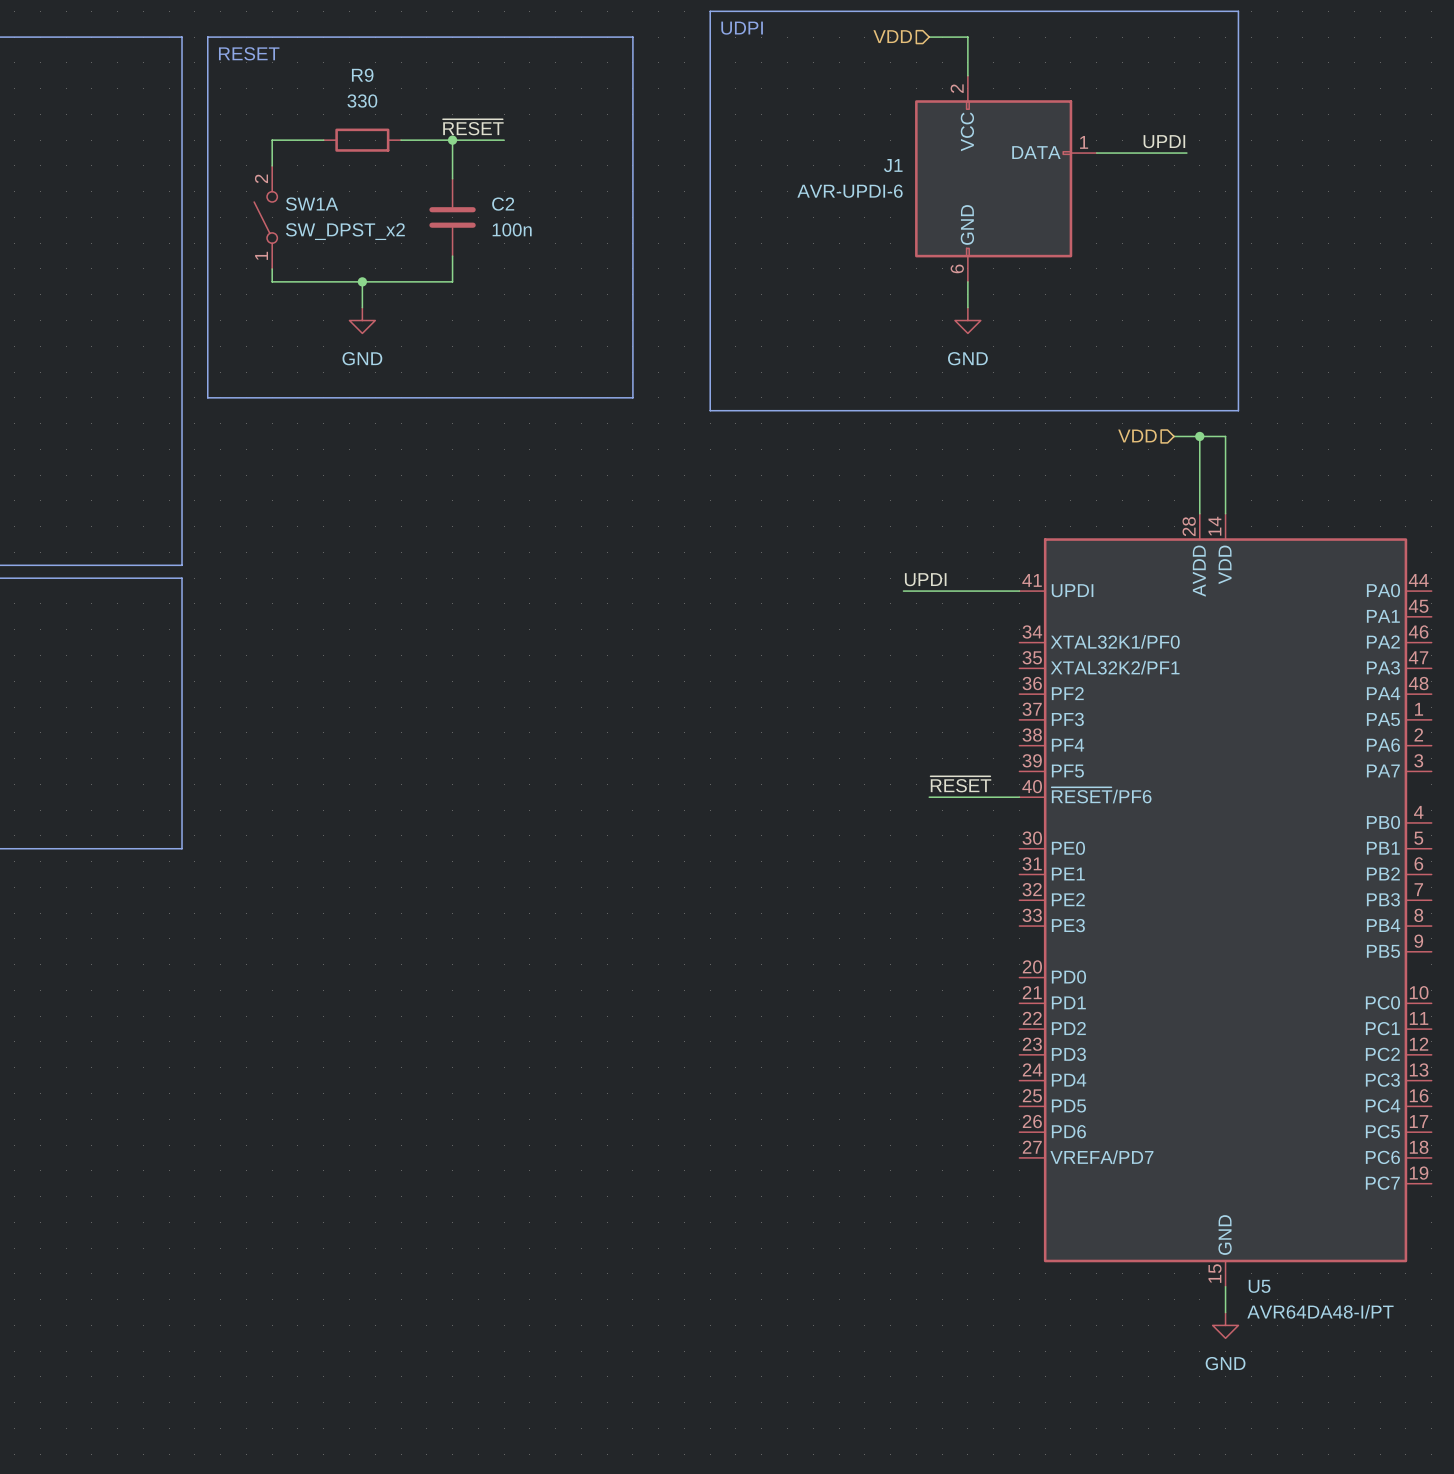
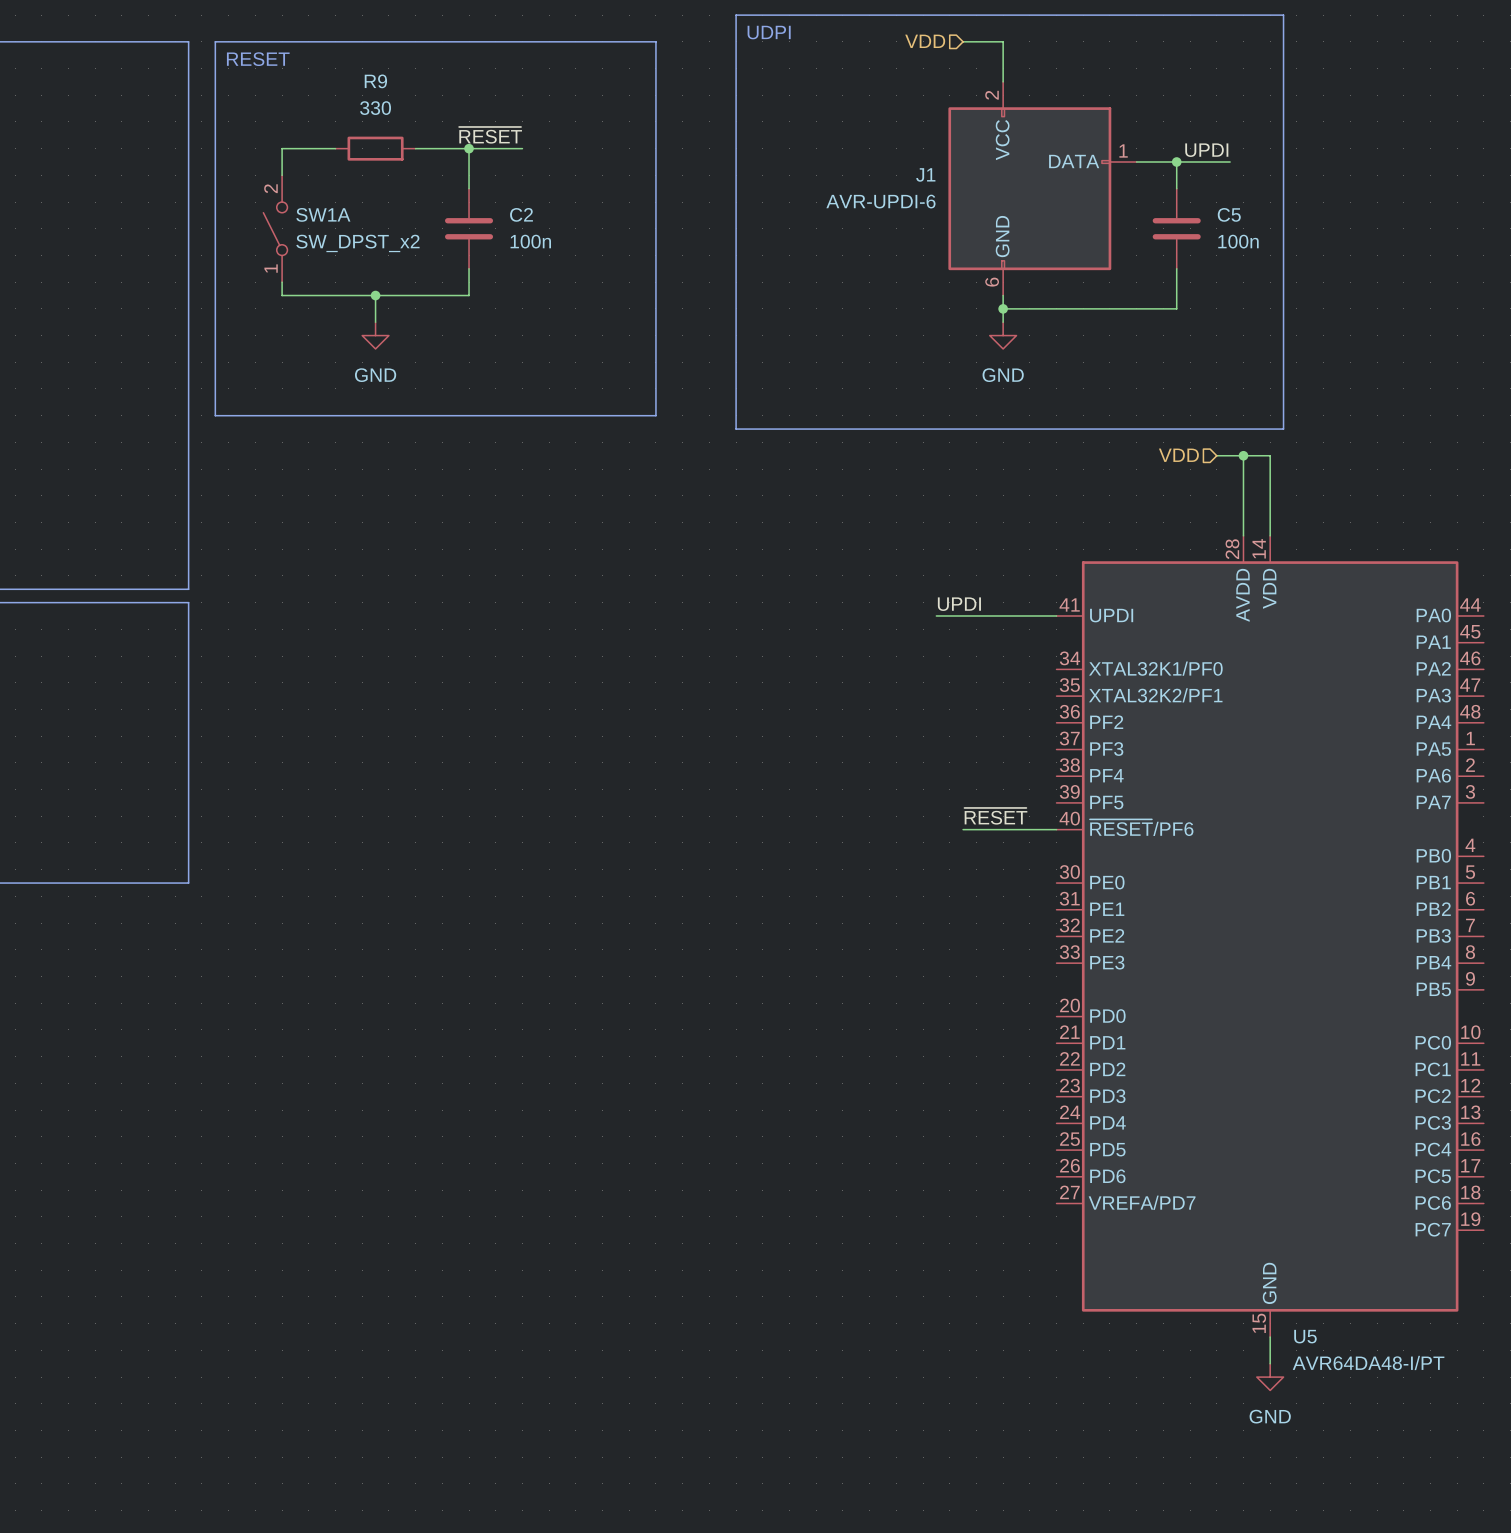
wire: none -> (1176, 162) (1176, 188)
junction: none -> (1176, 162)
C5: none -> 100n (1176, 228)
wire: none -> (1176, 268) (1176, 308) (1003, 308)
junction: none -> (1003, 308)

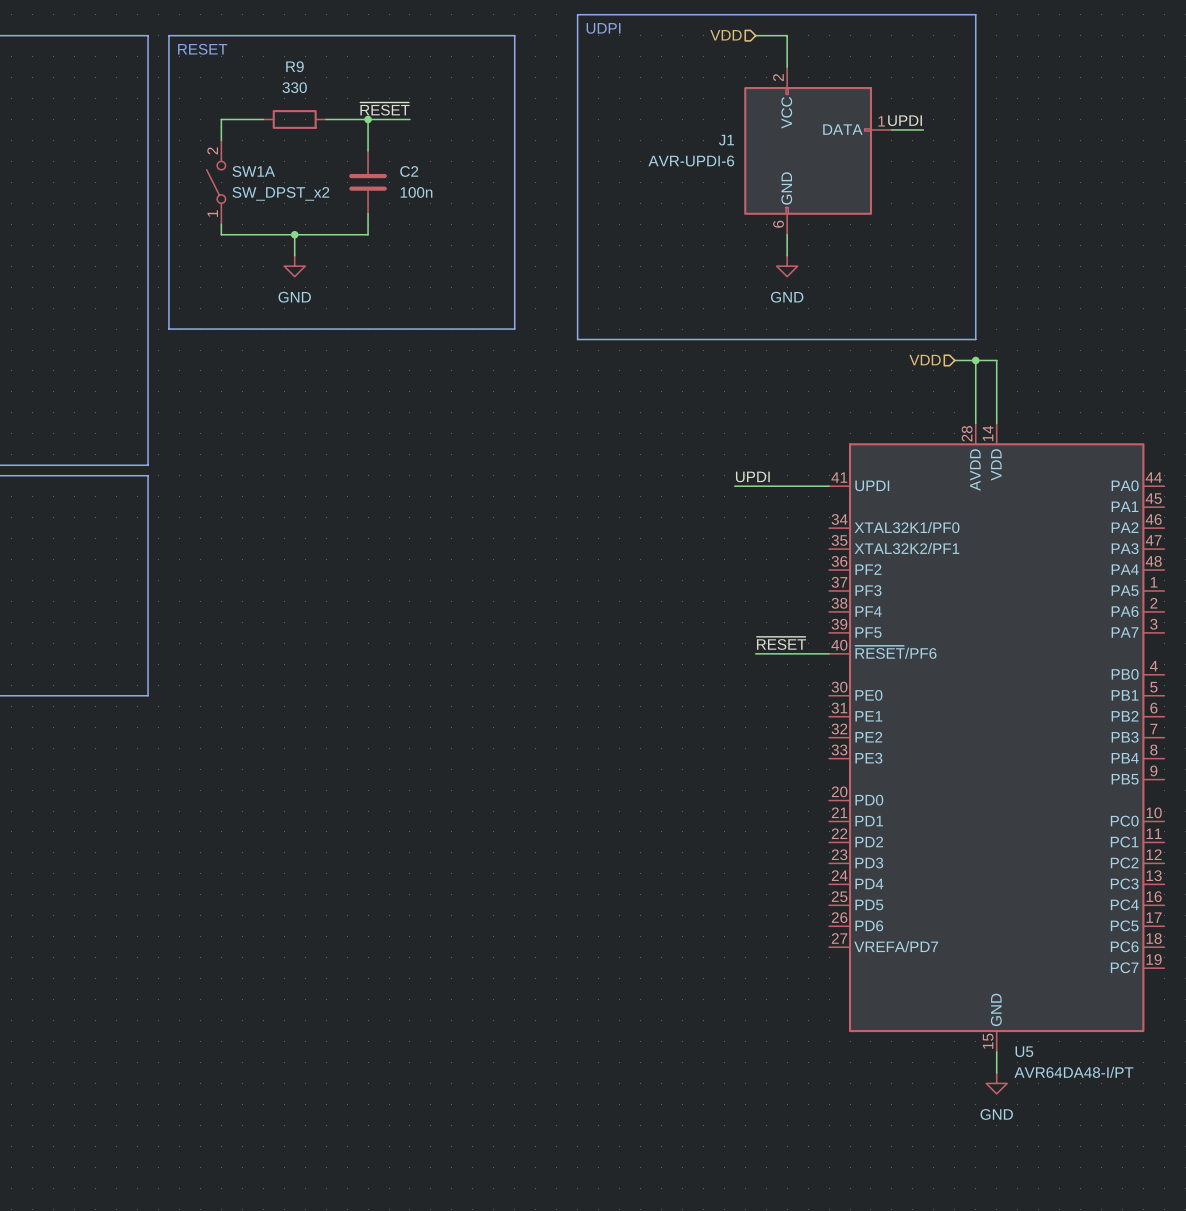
line: (1243, 15) (1283, 15) (1283, 429) (1243, 429) -> (975, 14) (975, 339)
label position: UPDI (1206, 150) -> UPDI (905, 120)
junction: (1176, 162) -> none
wire: (1230, 162) (1176, 162) (1176, 188) -> none
C5: 100n (1176, 228) -> none
wire: (1176, 268) (1176, 308) (1003, 308) -> none
junction: (1003, 308) -> none

